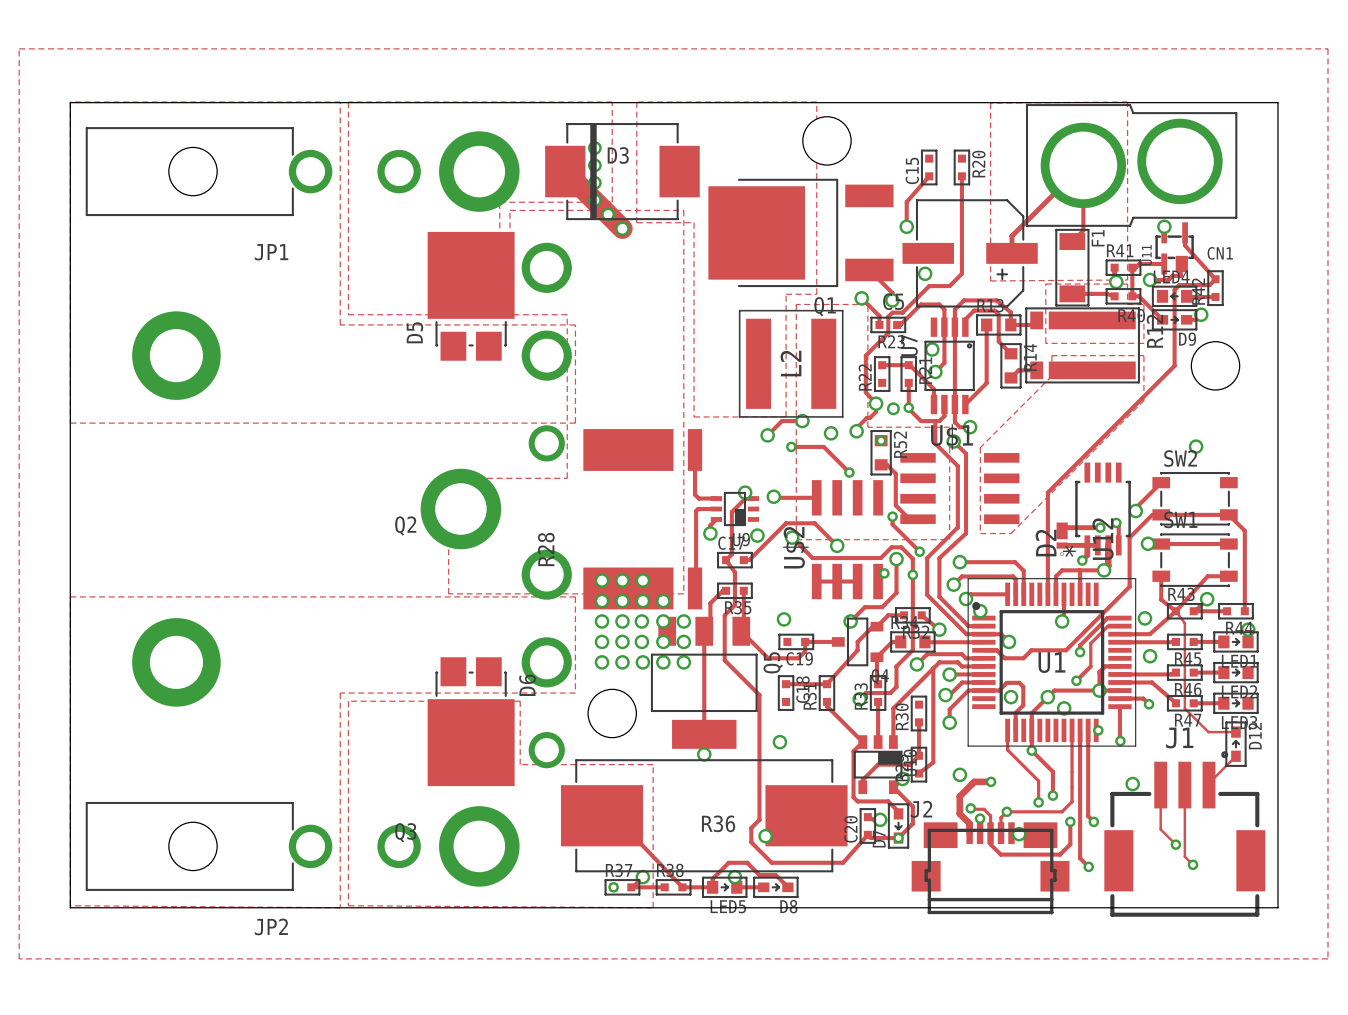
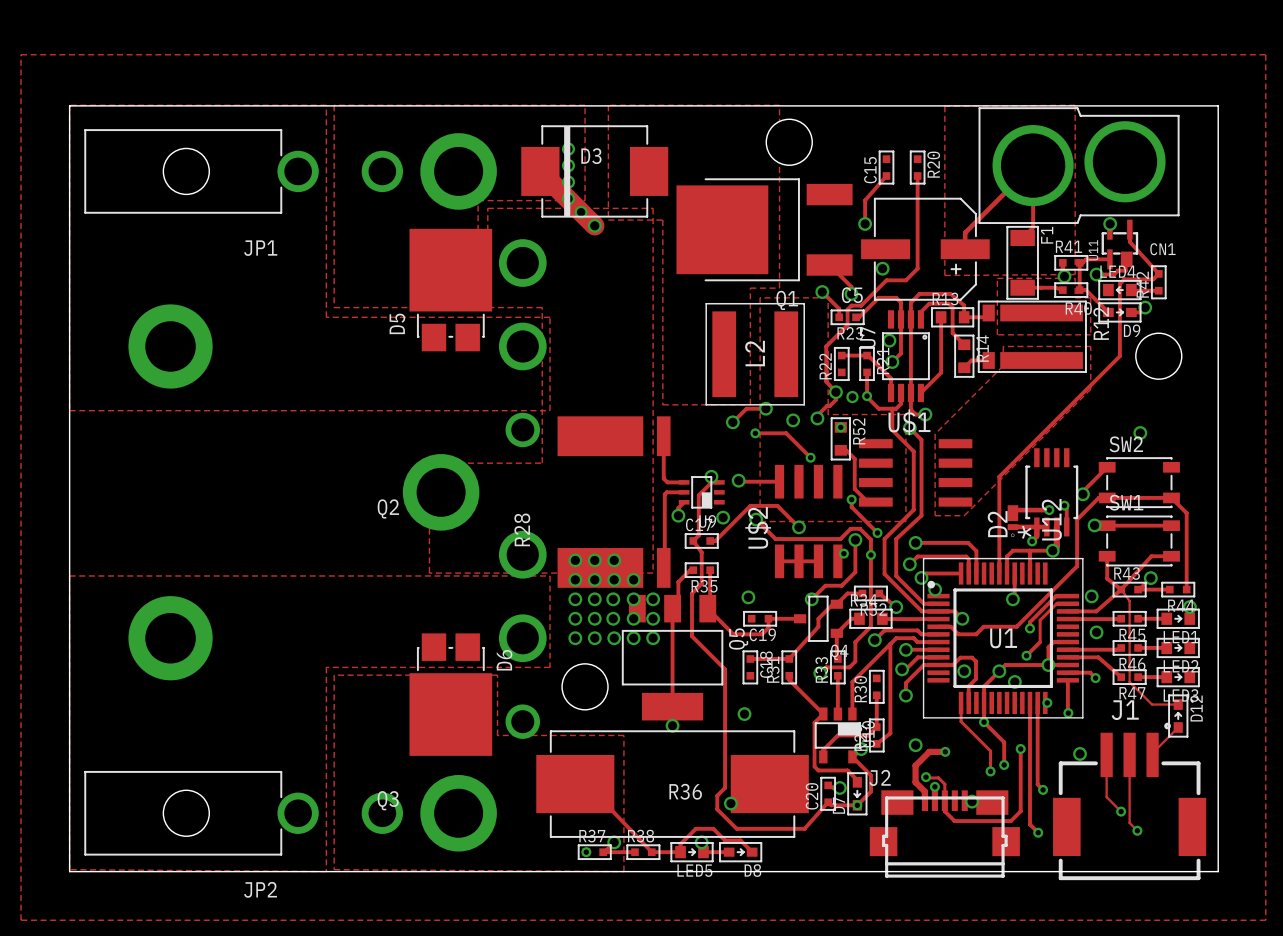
track: (1072, 730) (1072, 801) (1061, 811) (1006, 811) (1001, 817) (1001, 833) -> none
track: none -> (1020, 748) (1020, 789)
via: none -> (1020, 748)
via: (1006, 811) -> none
via: (1070, 821) -> none

